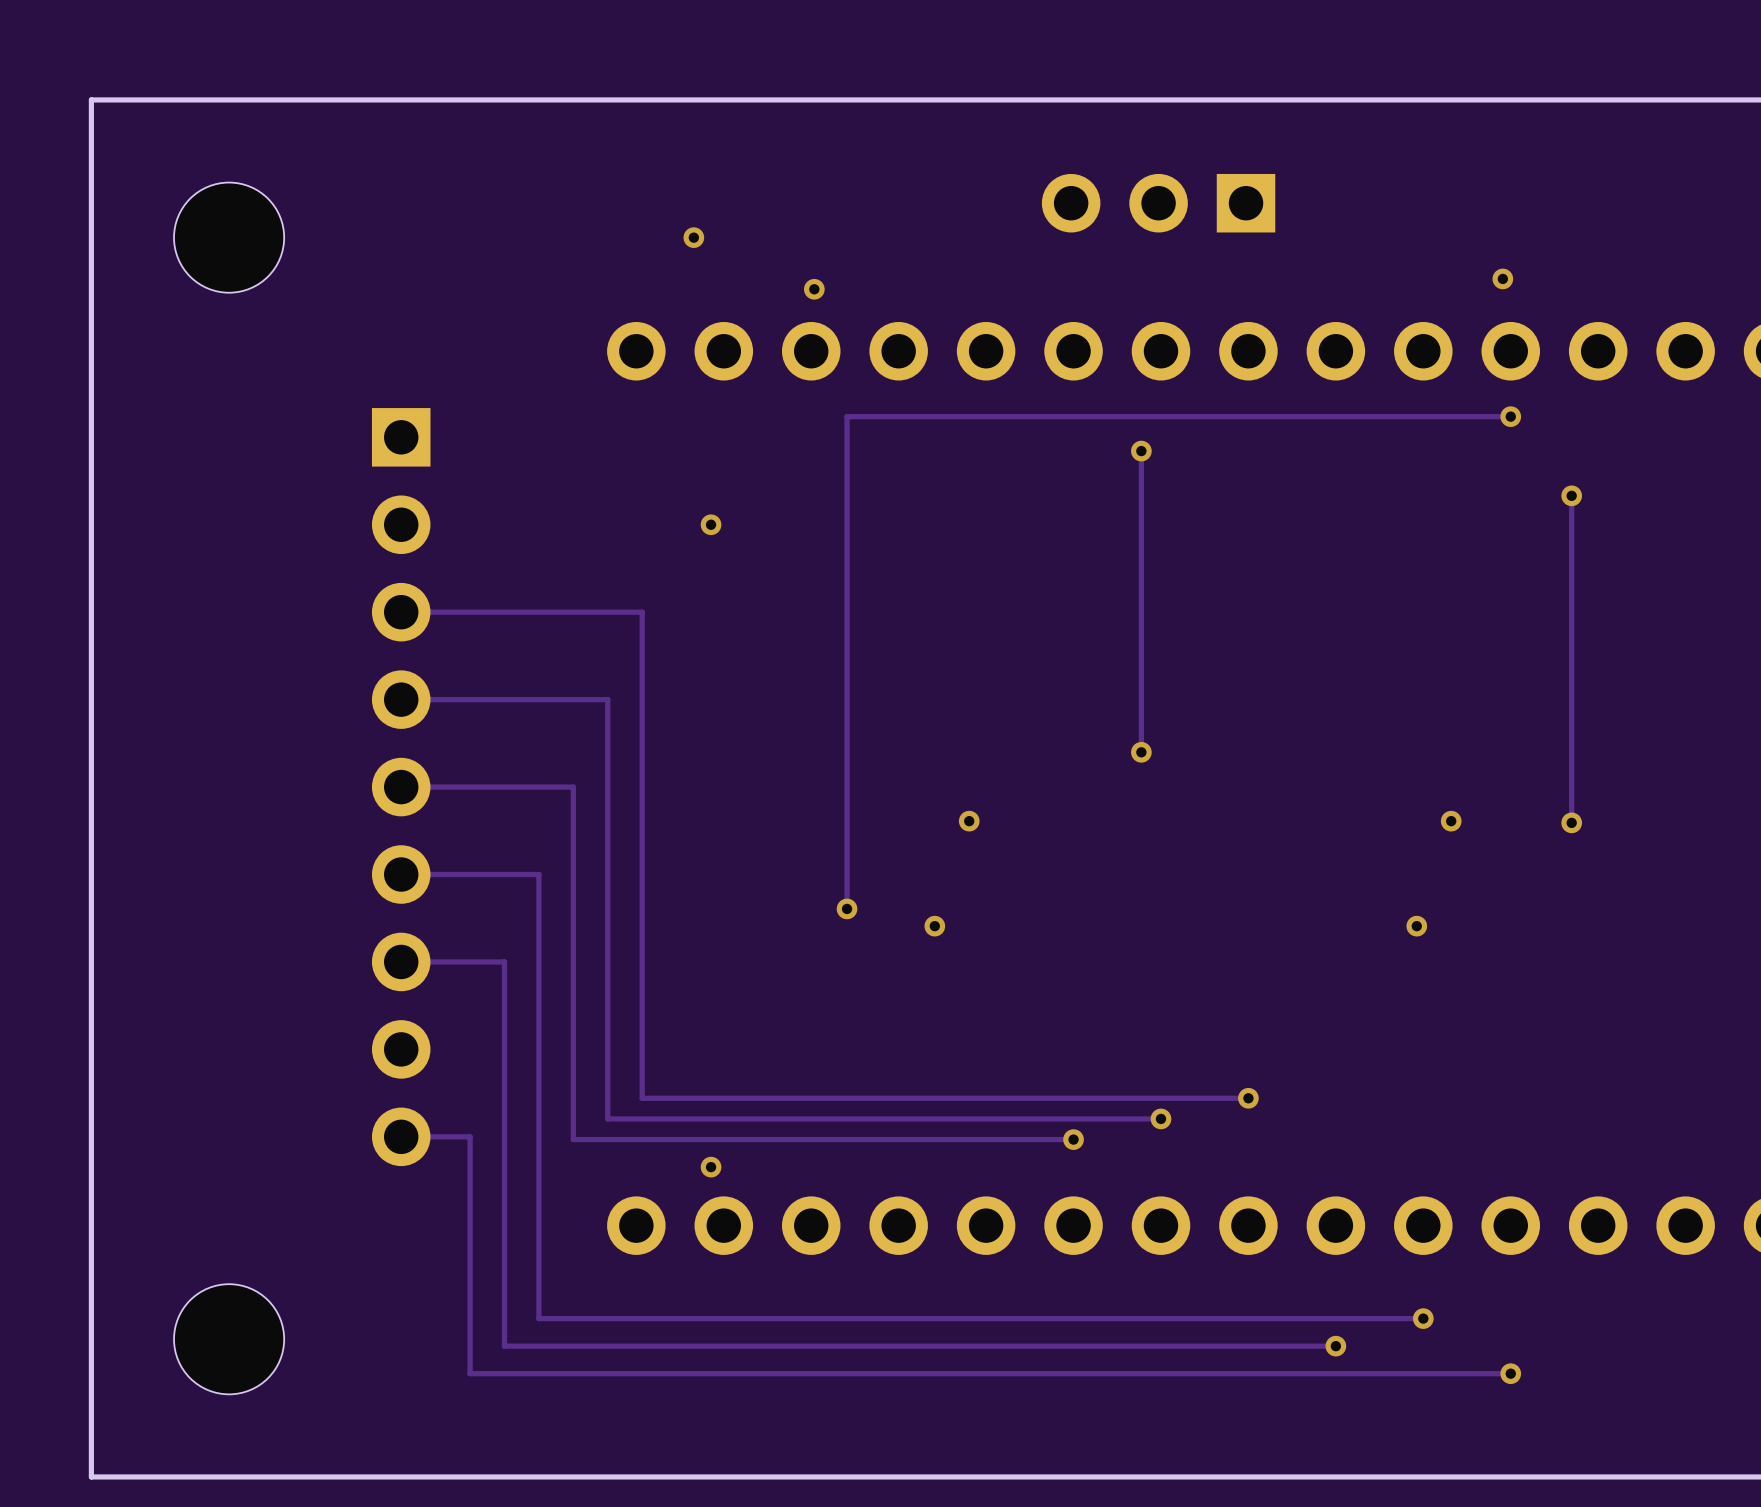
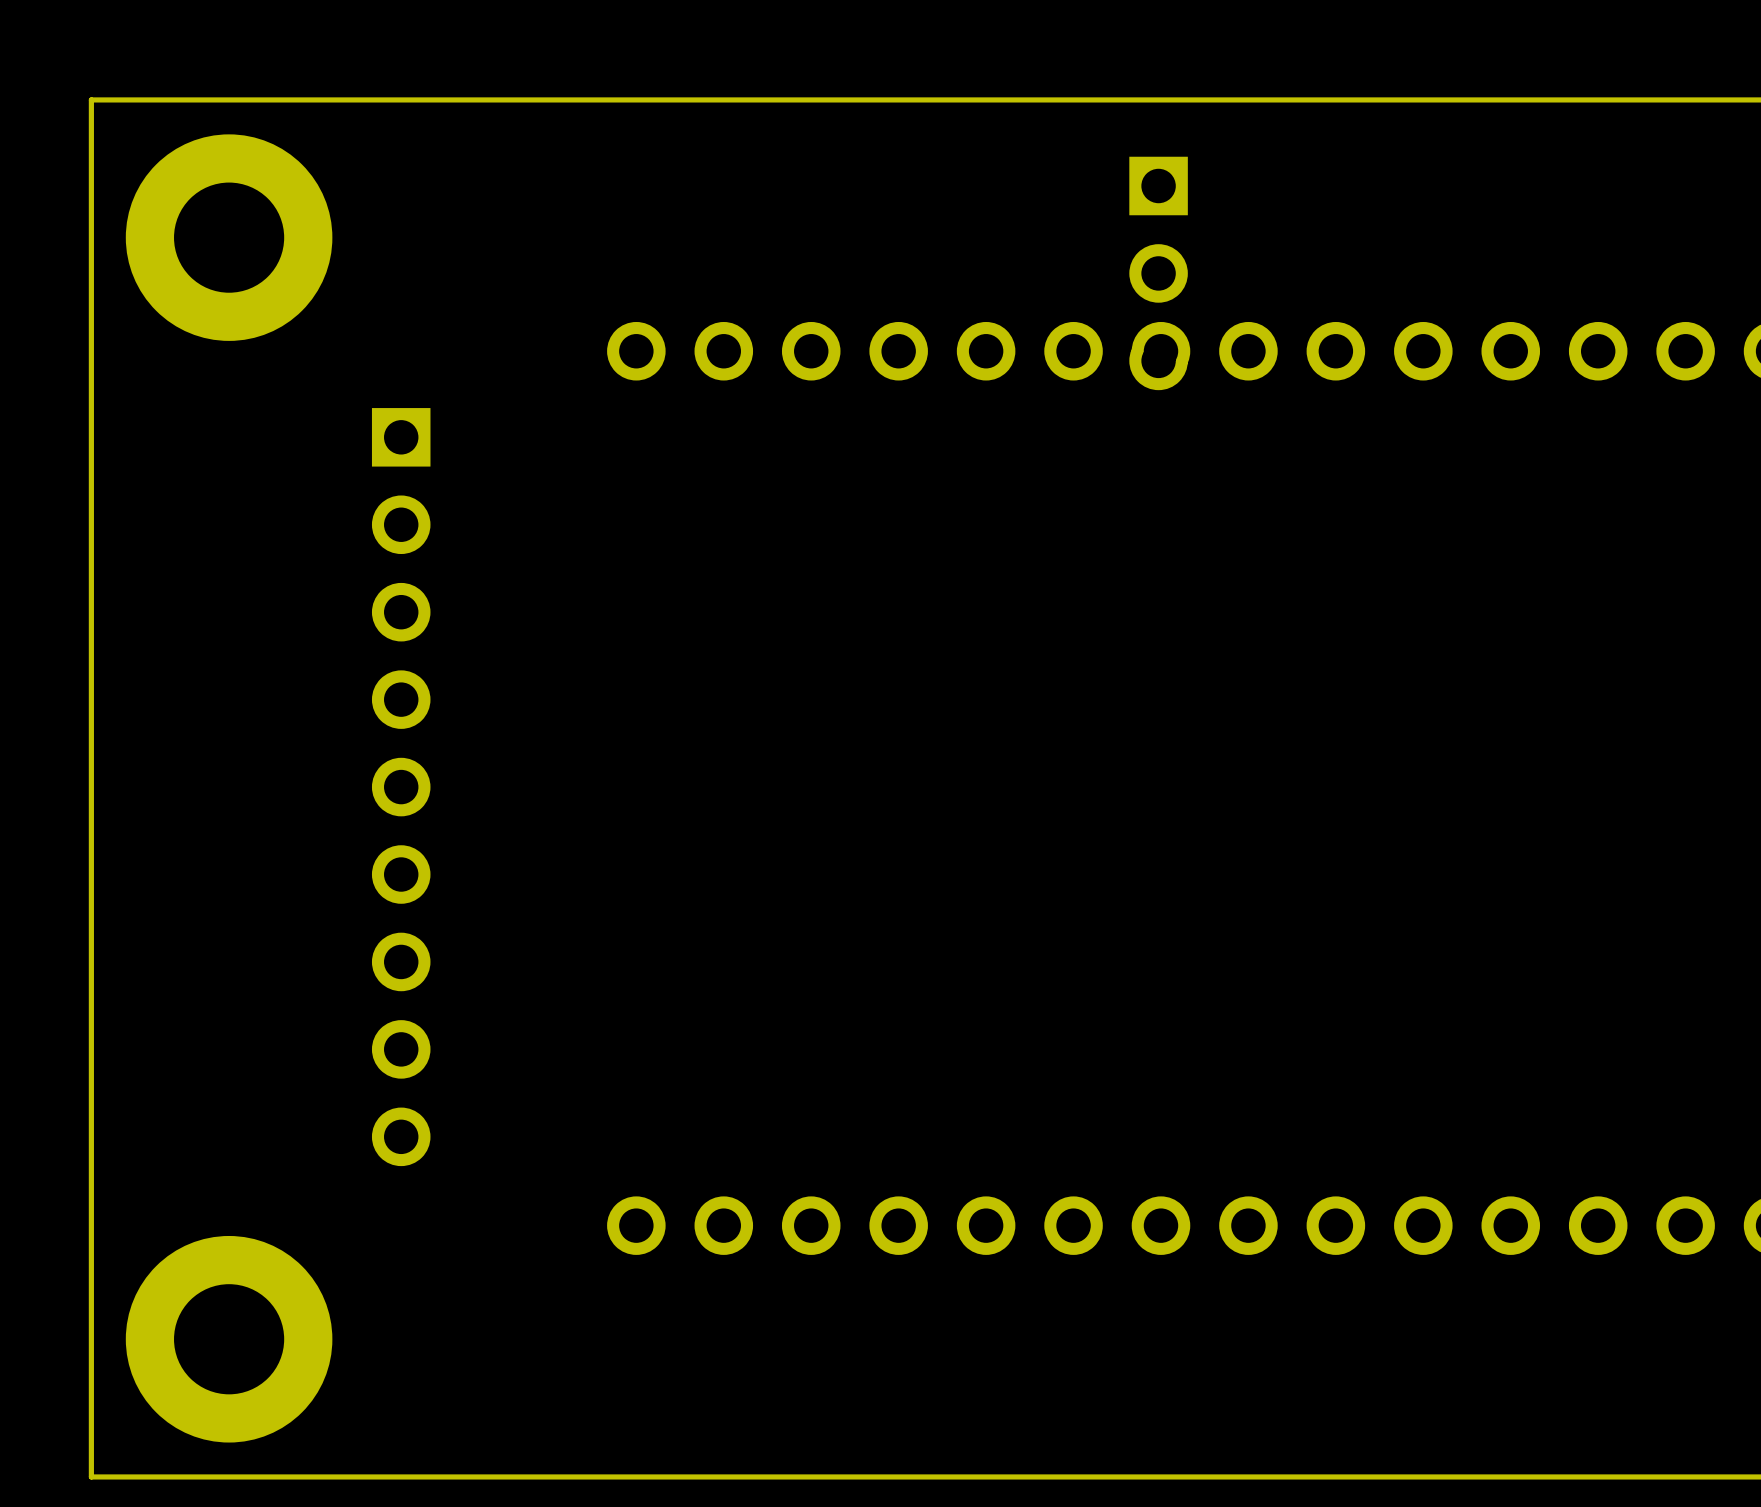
part footprint: [174, 182, 285, 293] -> [125, 134, 333, 341]
part rotation: 0° (1158, 203) -> 90° counterclockwise (1158, 273)
via: (693, 237) -> none
via: (1502, 278) -> none
via: (814, 289) -> none
track: (1510, 416) (847, 416) (847, 908) -> none
via: (1510, 416) -> none
track: (1141, 451) (1141, 752) -> none
via: (1141, 451) -> none
track: (1571, 495) (1571, 822) -> none
via: (1571, 495) -> none
via: (711, 524) -> none
track: (401, 612) (642, 612) (642, 1098) (1248, 1098) -> none
track: (401, 699) (607, 699) (607, 1118) (1160, 1118) -> none
via: (1141, 752) -> none
track: (401, 787) (573, 787) (573, 1139) (1073, 1139) -> none
via: (969, 821) -> none
via: (1451, 821) -> none
via: (1571, 822) -> none
track: (401, 874) (538, 874) (538, 1318) (1423, 1318) -> none
via: (847, 908) -> none
via: (934, 926) -> none
via: (1416, 926) -> none
track: (401, 961) (504, 961) (504, 1346) (1335, 1346) -> none
via: (1248, 1098) -> none
via: (1160, 1118) -> none
track: (401, 1136) (470, 1136) (470, 1373) (1510, 1373) -> none
via: (1073, 1139) -> none
via: (711, 1167) -> none
part footprint: [174, 1284, 285, 1395] -> [125, 1235, 333, 1443]
via: (1423, 1318) -> none
via: (1335, 1346) -> none
via: (1510, 1373) -> none

